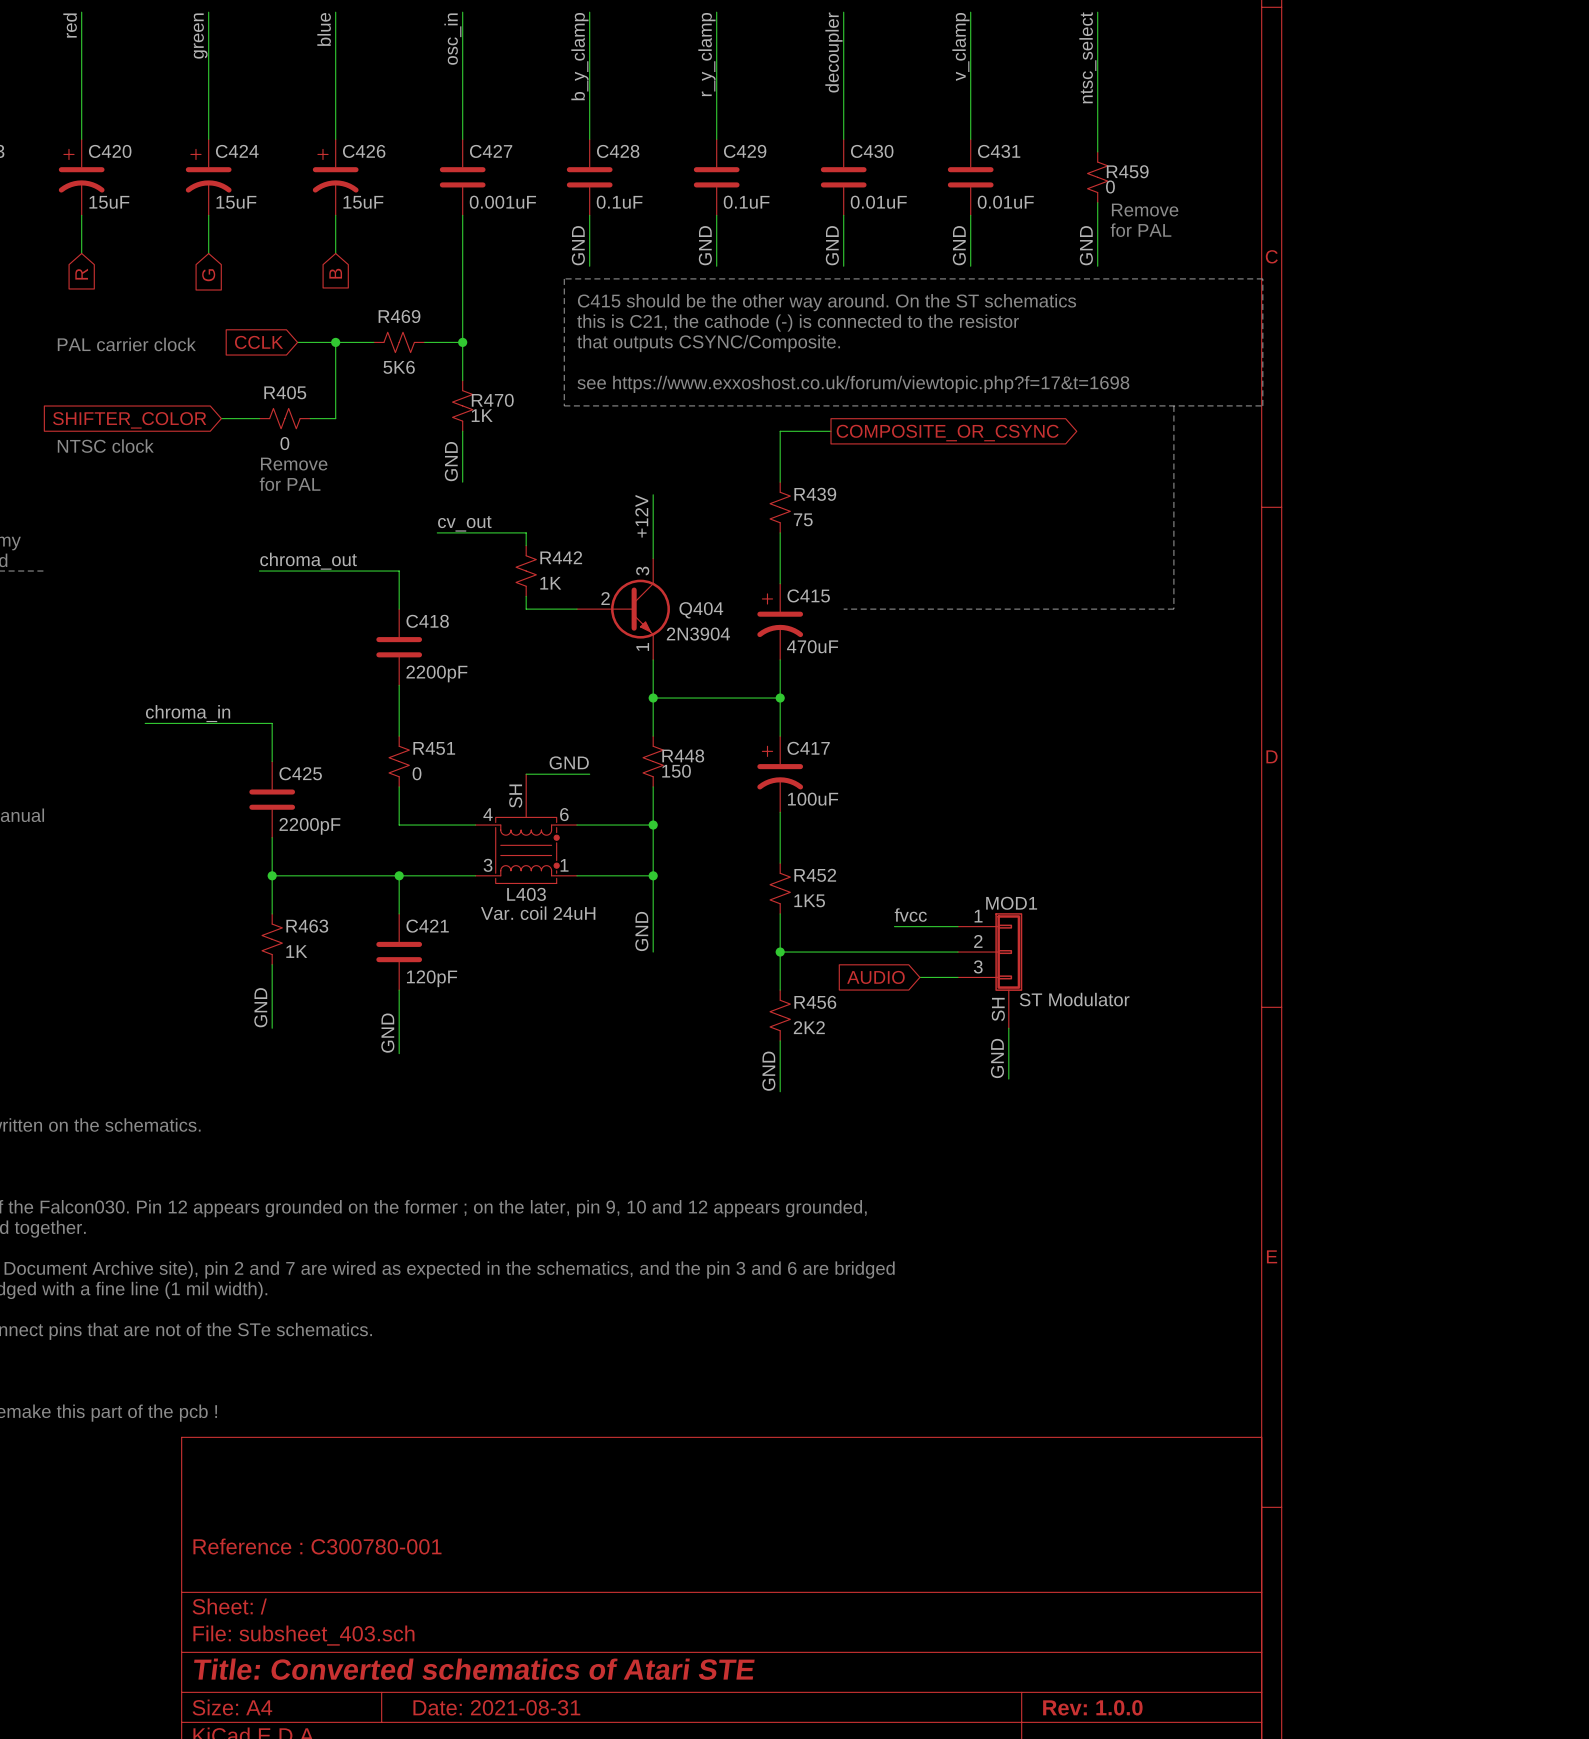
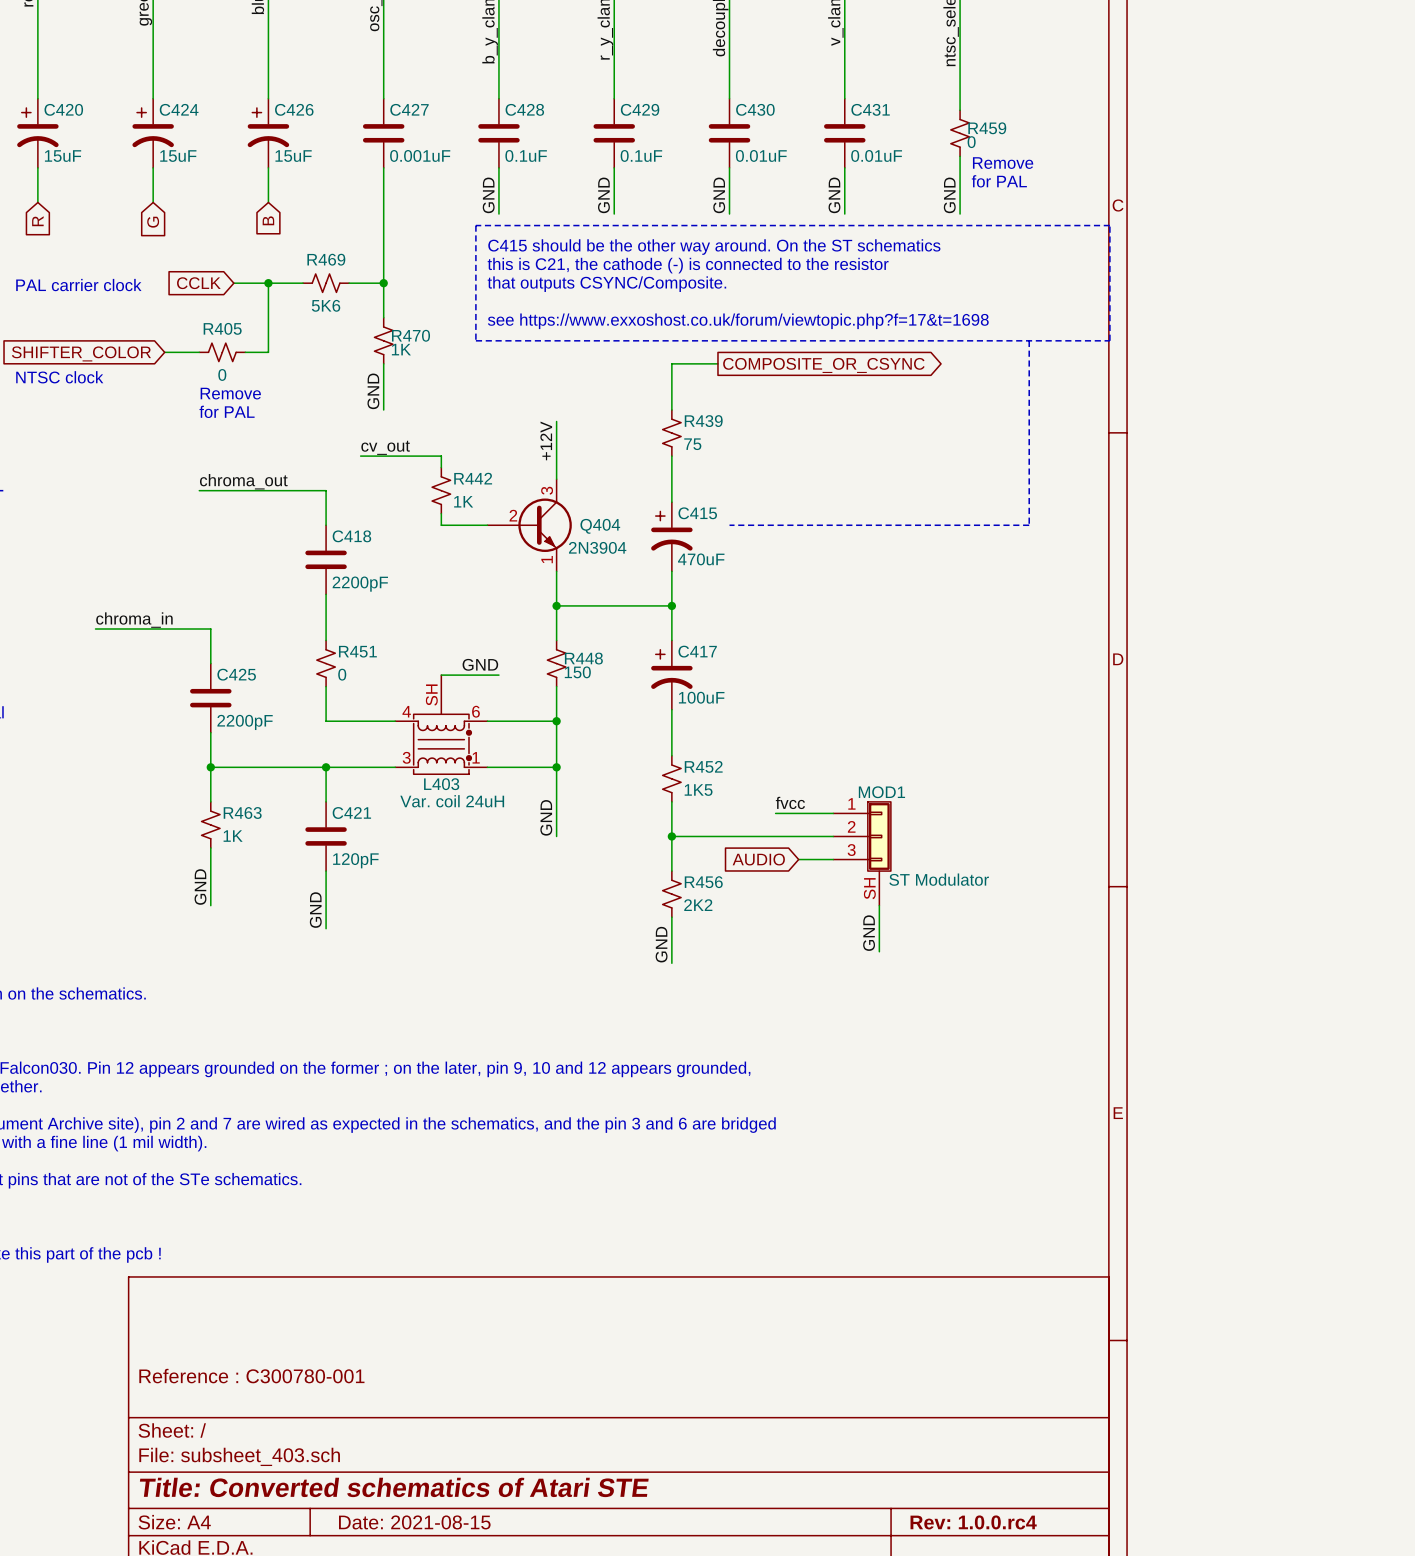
title block: Date: 2021-08-31 (496, 1707) -> Date: 2021-08-15 (414, 1522)
title block: Rev: 1.0.0 (1092, 1707) -> Rev: 1.0.0.rc4 (973, 1522)

